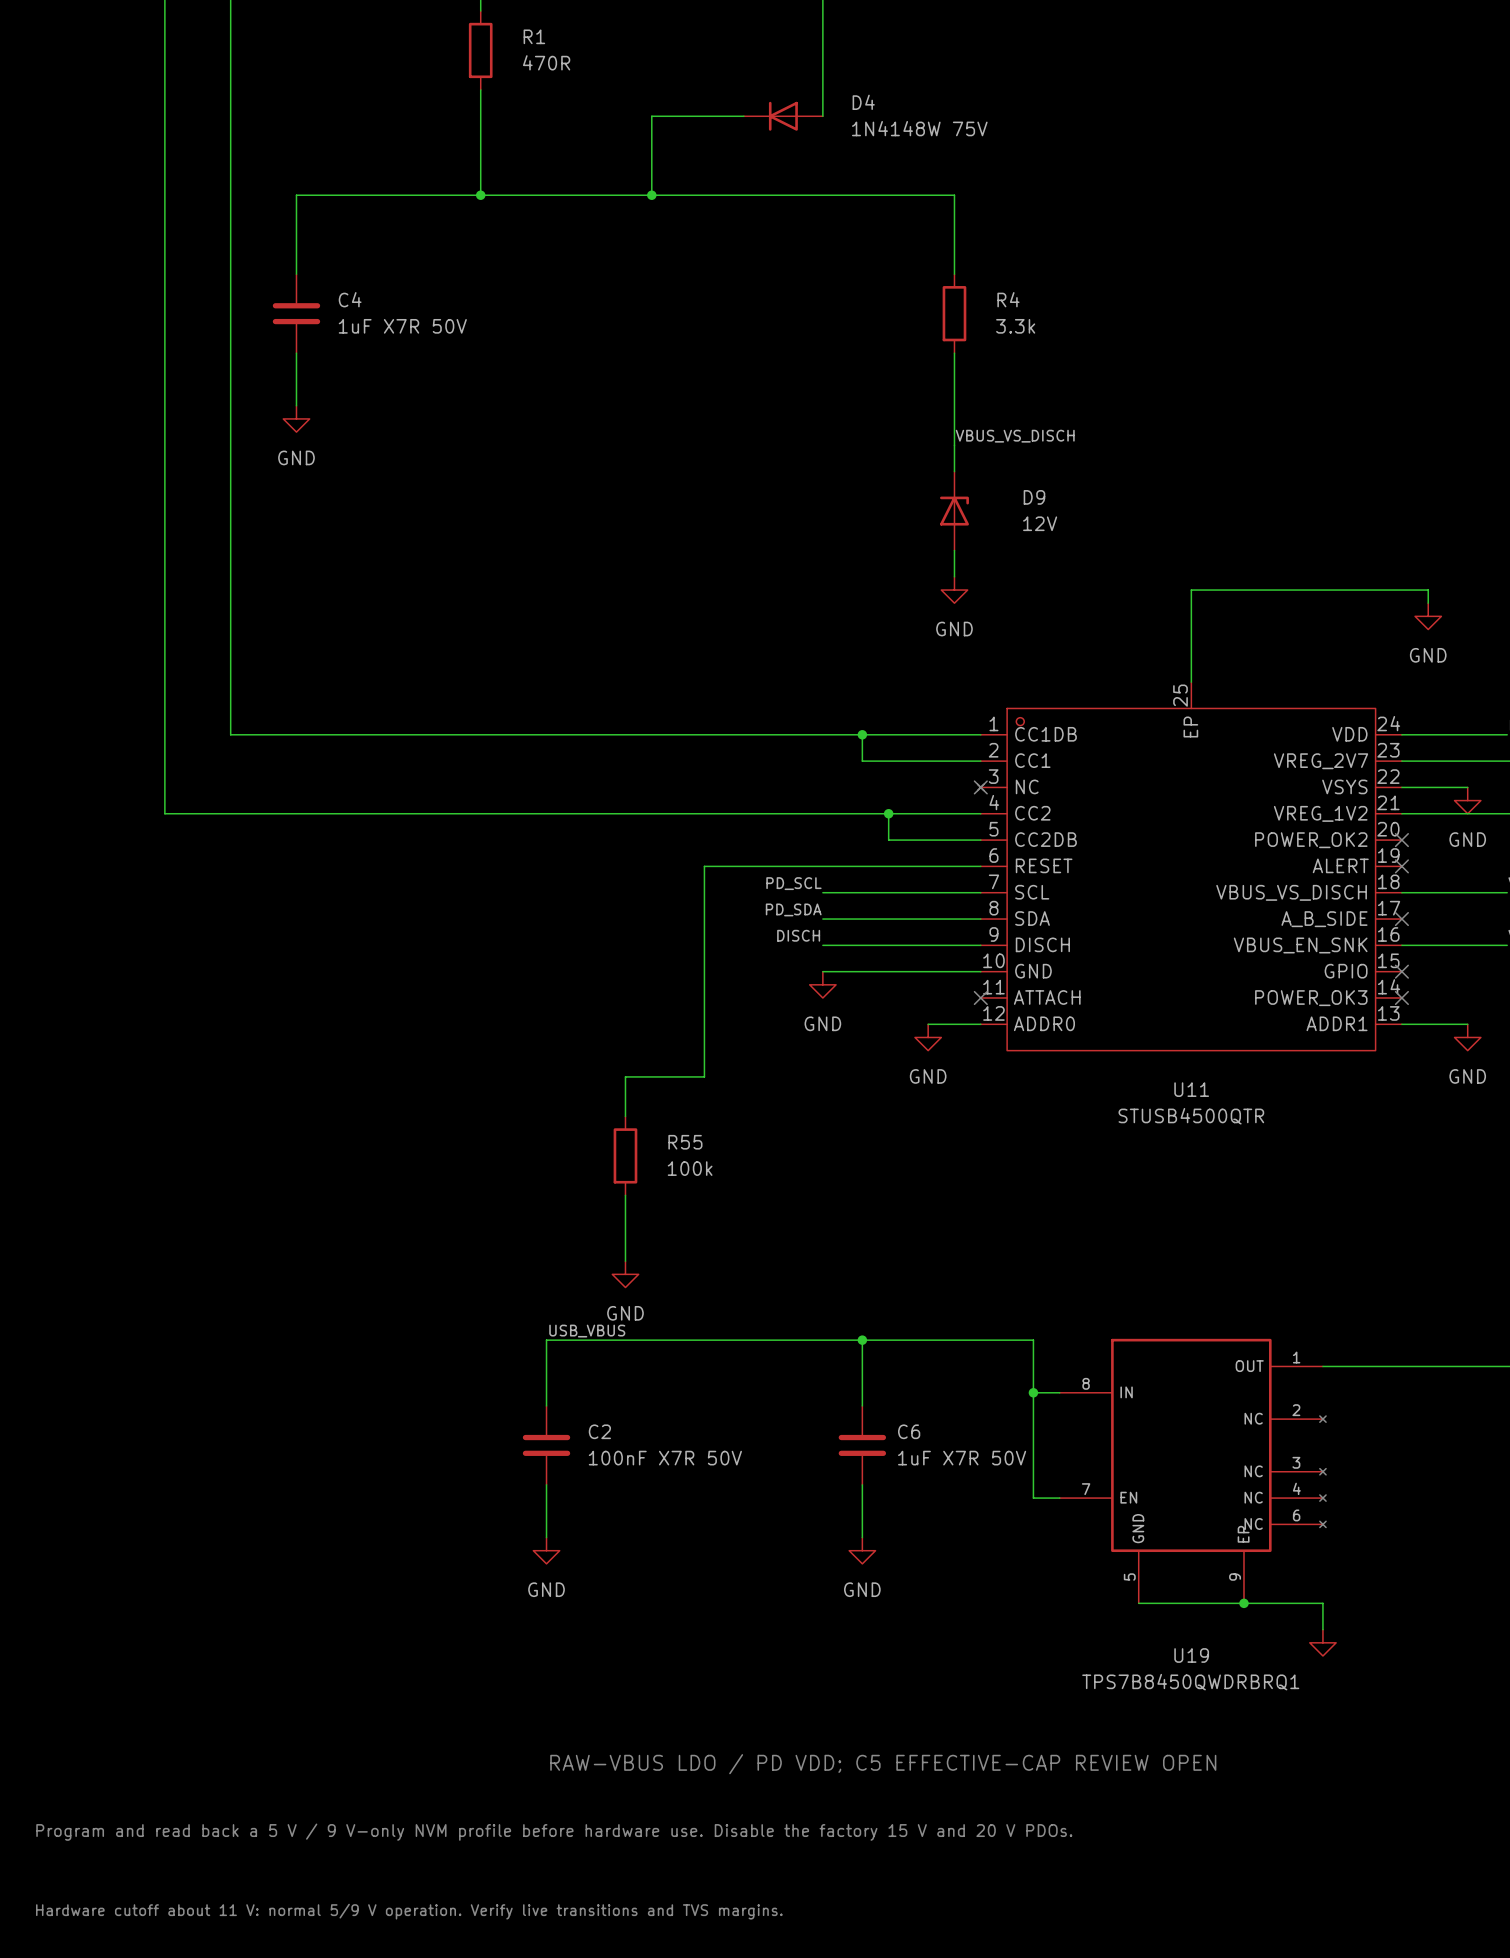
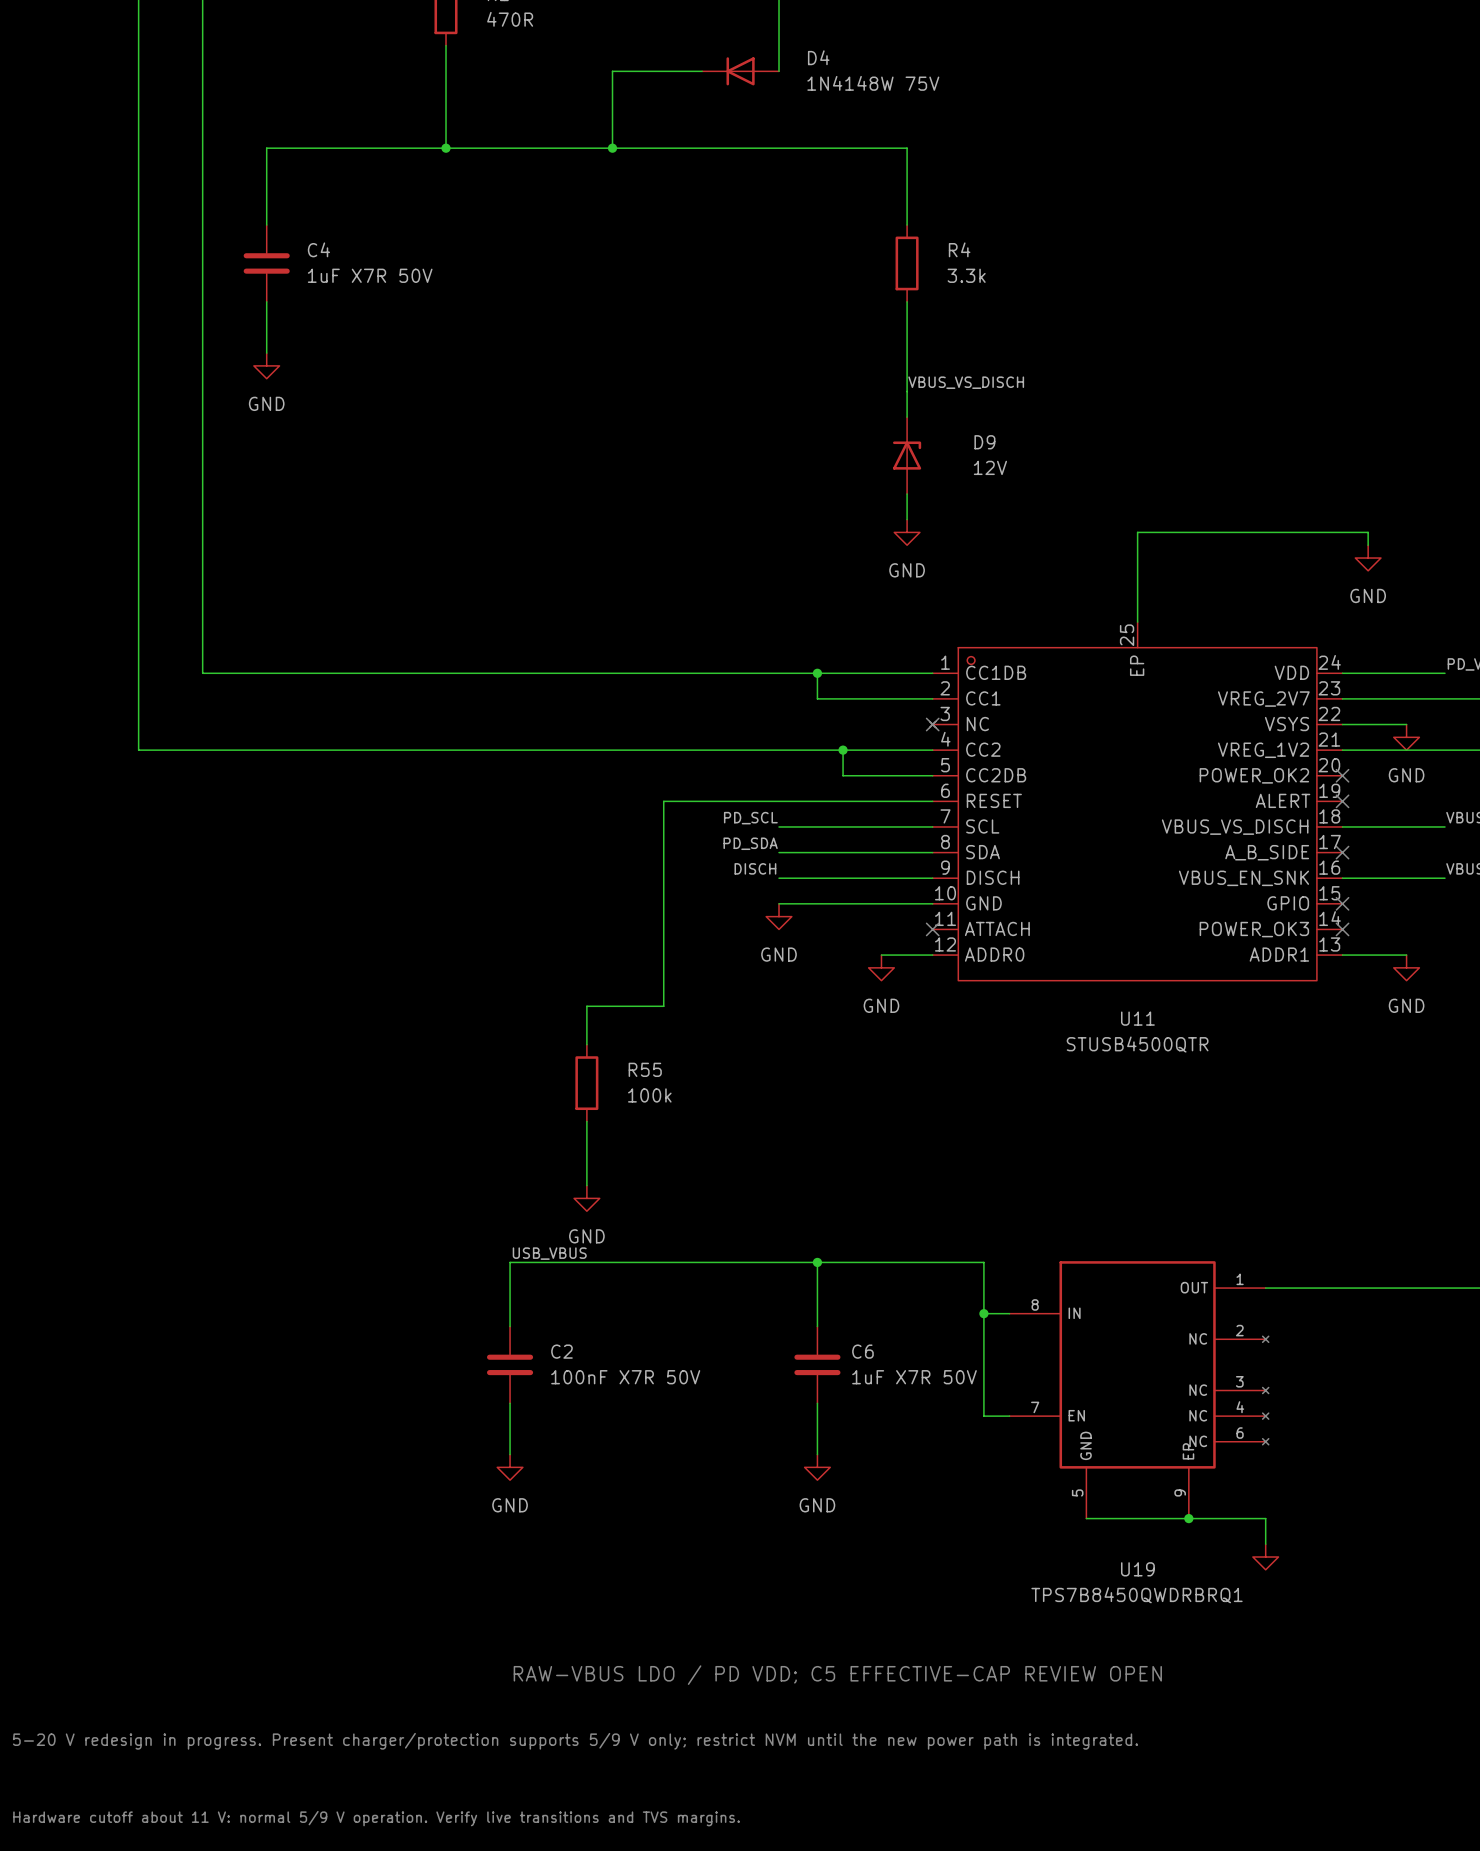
text: Program and read back a 5 V / 9 V-only NVM profile before hardware use. Disable the factory 15 V and 20 V PDOs. (554, 1832) -> 5-20 V redesign in progress. Present charger/protection supports 5/9 V only; restrict NVM until the new power path is integrated. (575, 1741)

